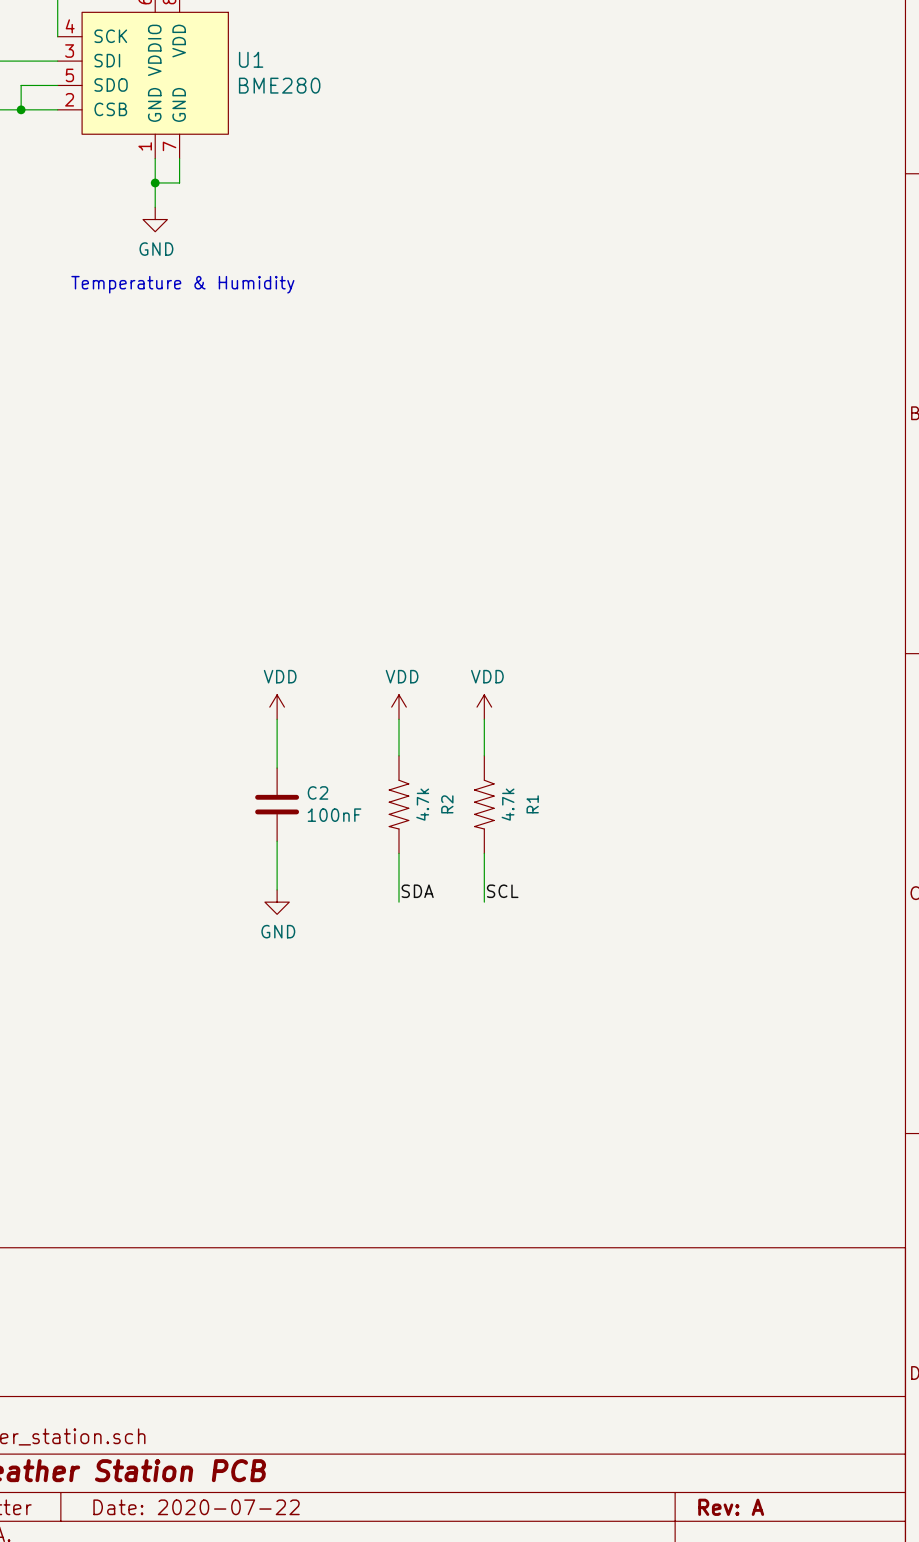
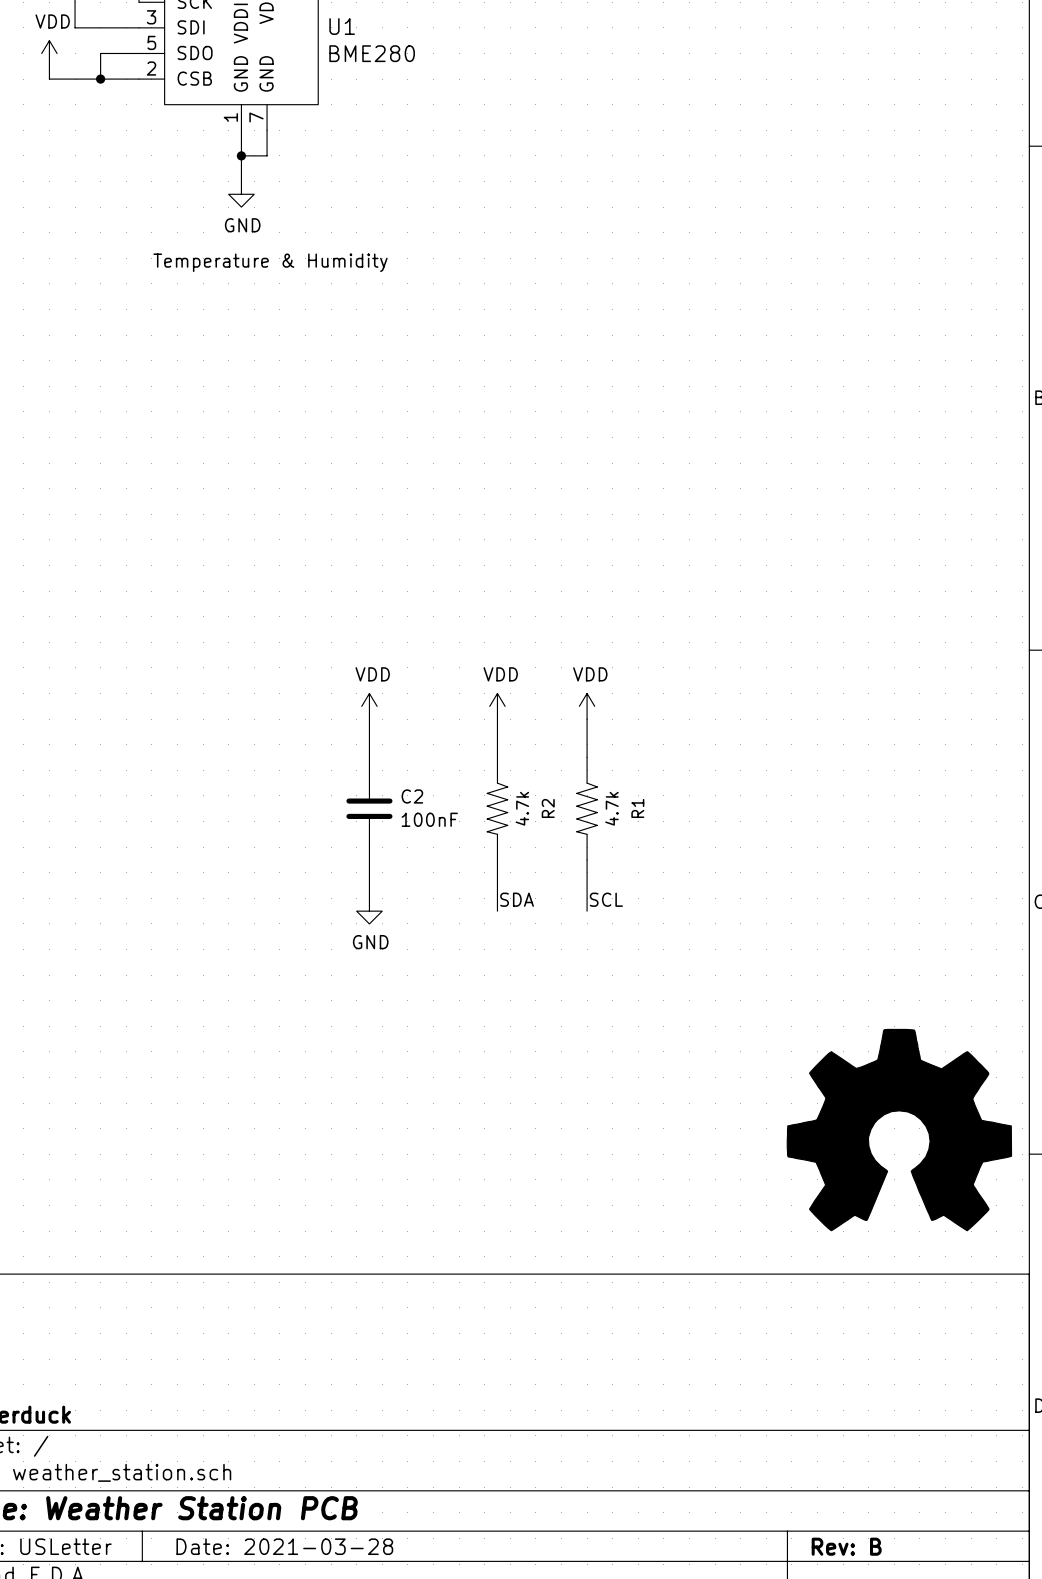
power symbol: none -> (899, 1130)
title block: Date: 2020-07-22 (196, 1507) -> Date: 2021-03-28 (284, 1546)
title block: Rev: A (731, 1507) -> Rev: B (846, 1546)

